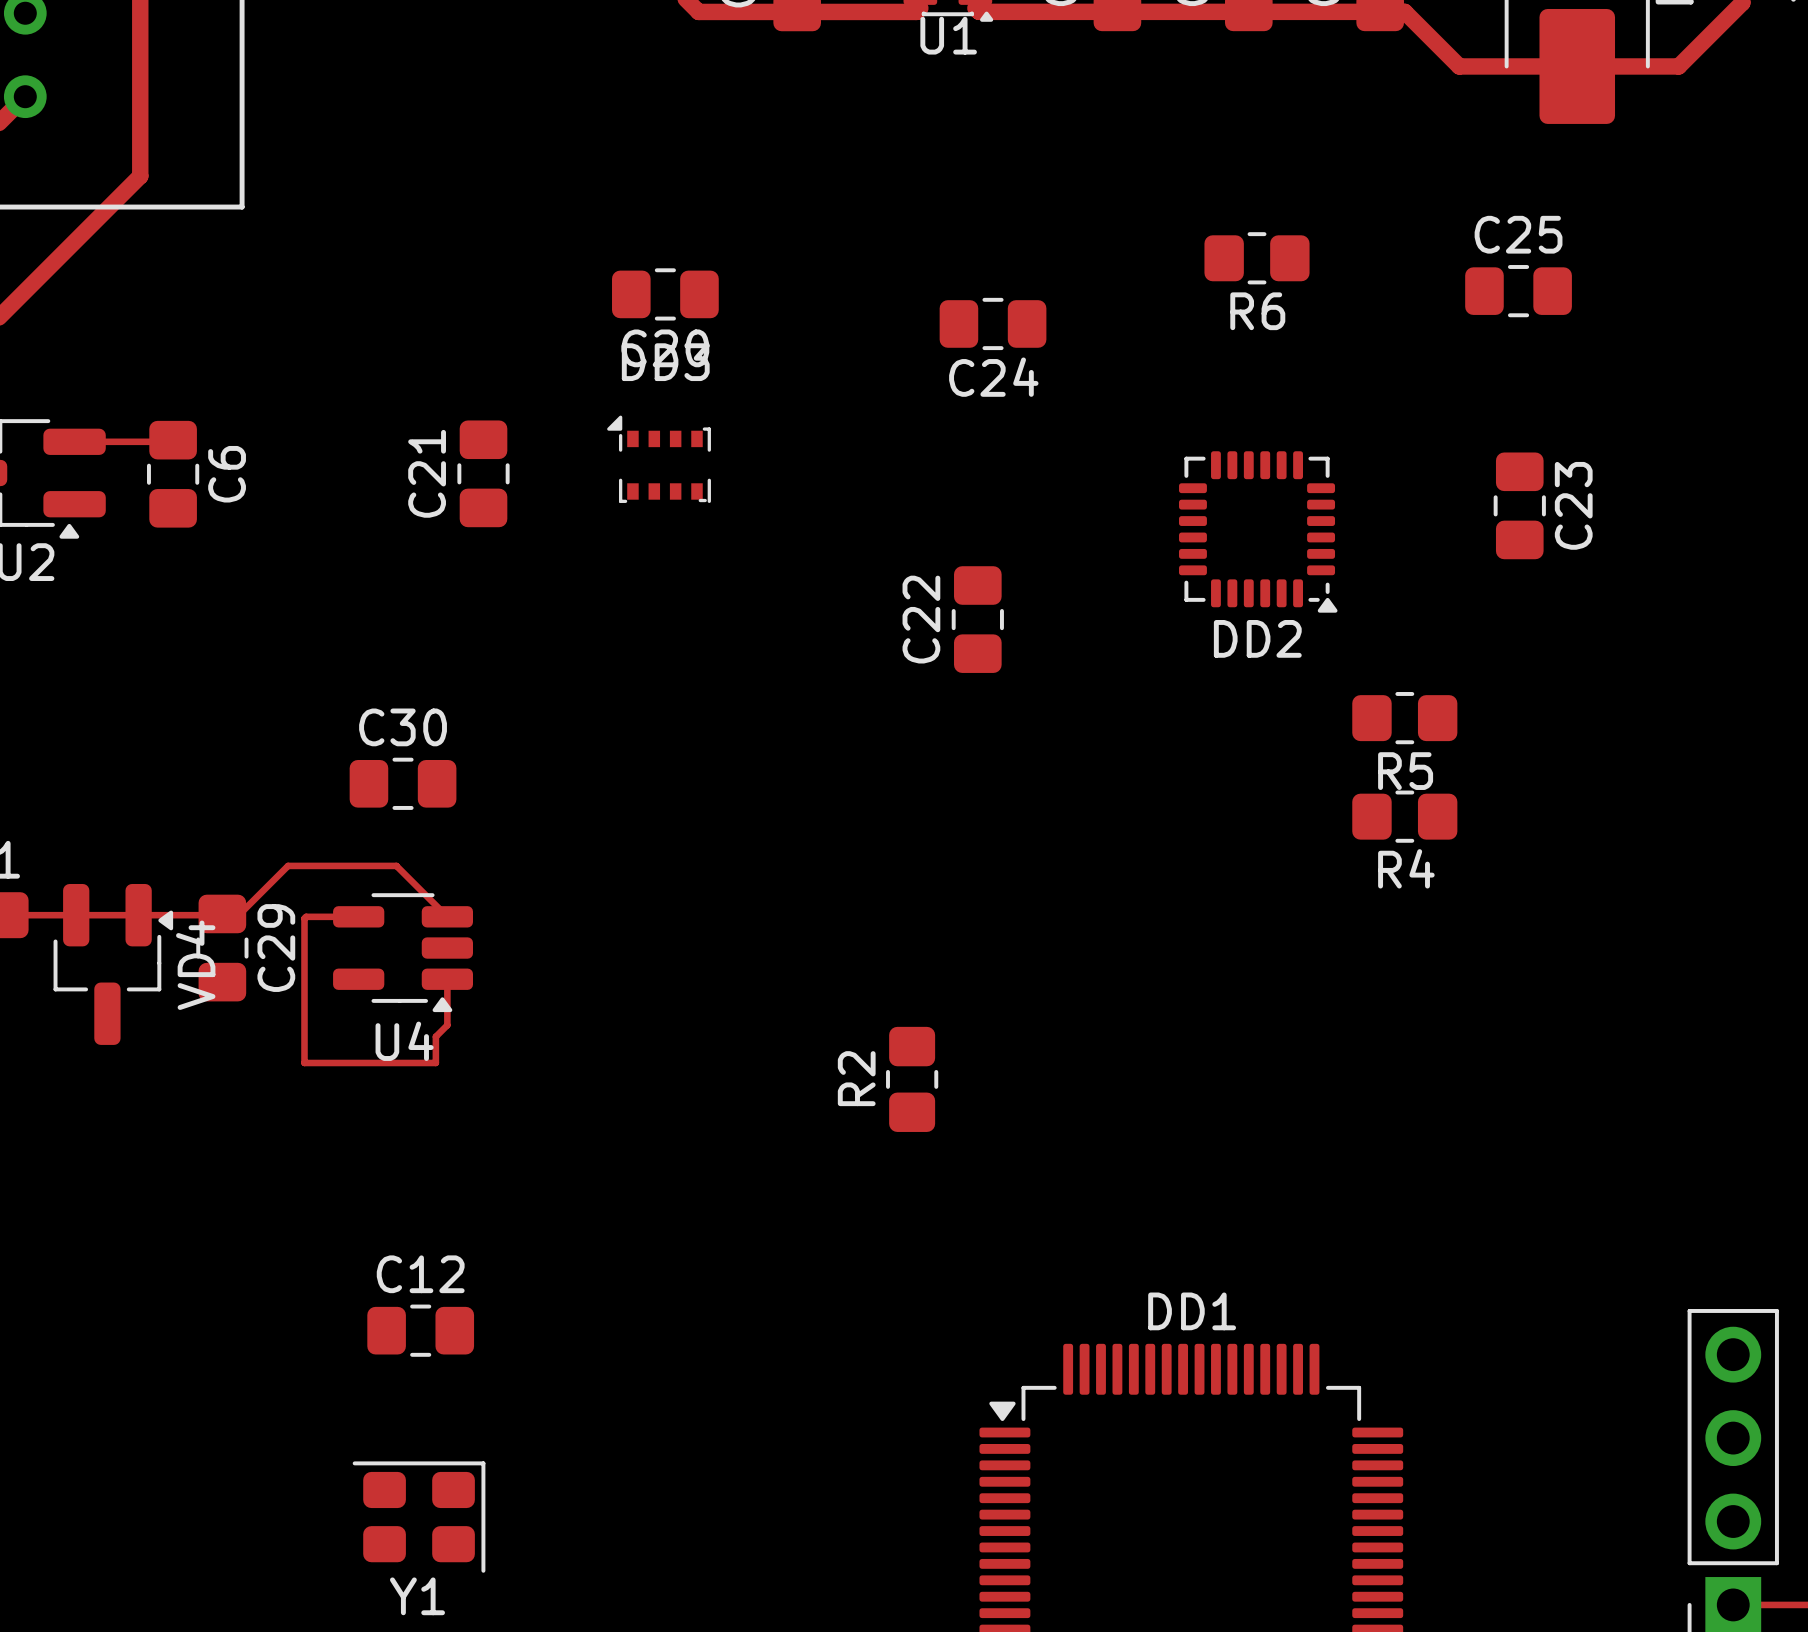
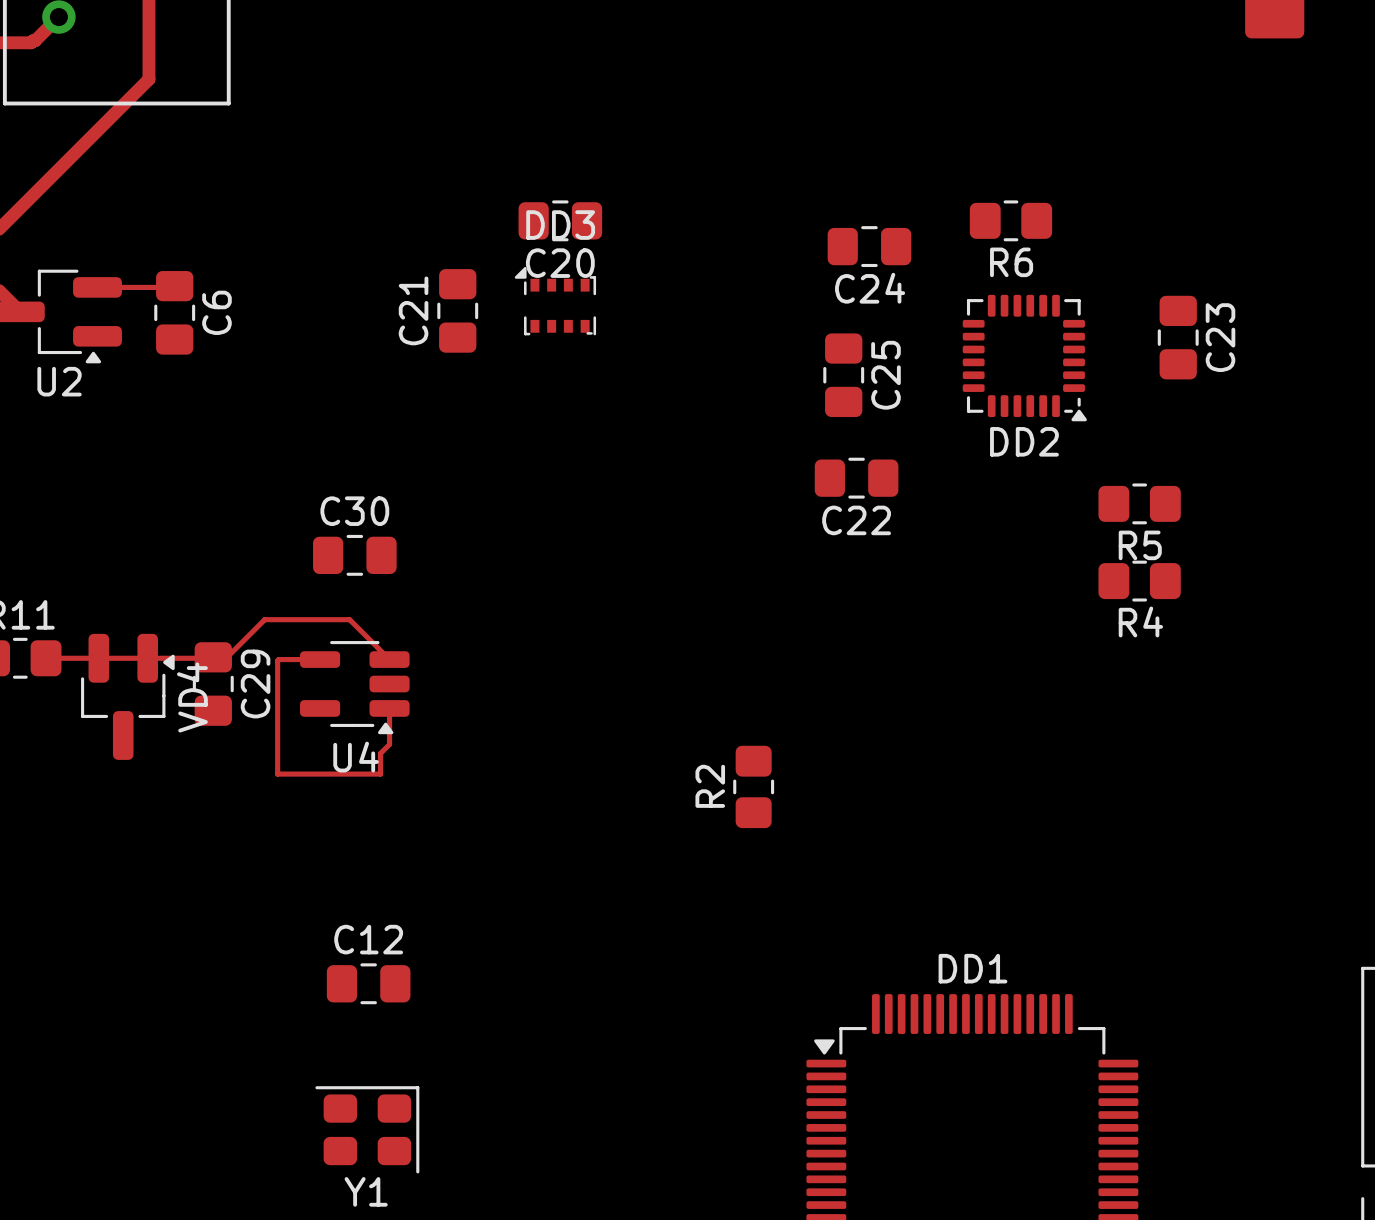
R6 position: (1257, 258) -> (1010, 220)
C25 rotation: 0° (1518, 291) -> 90° clockwise (843, 375)
C25 position: (1518, 291) -> (843, 375)
C20 position: (665, 294) -> (560, 220)
C24 position: (993, 323) -> (869, 246)
C21 position: (483, 473) -> (457, 310)
C23 position: (1519, 505) -> (1178, 337)
C22 name position: C22 (921, 619) -> C22 (856, 520)
C22 rotation: 0° (977, 619) -> 90° clockwise (856, 478)
C22 position: (977, 619) -> (856, 478)

